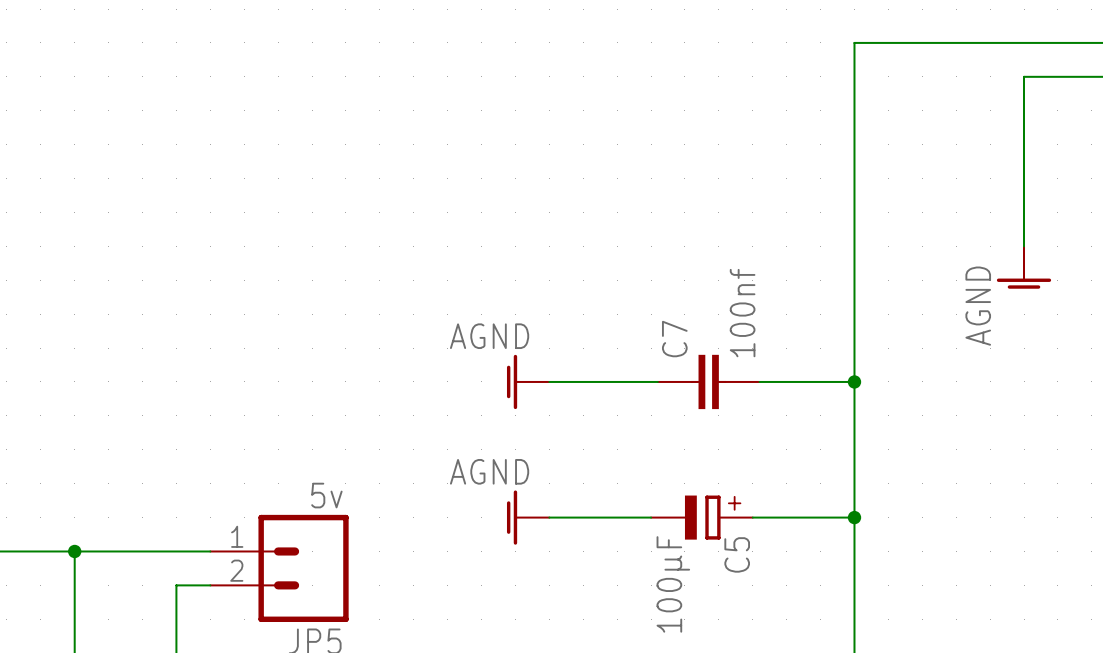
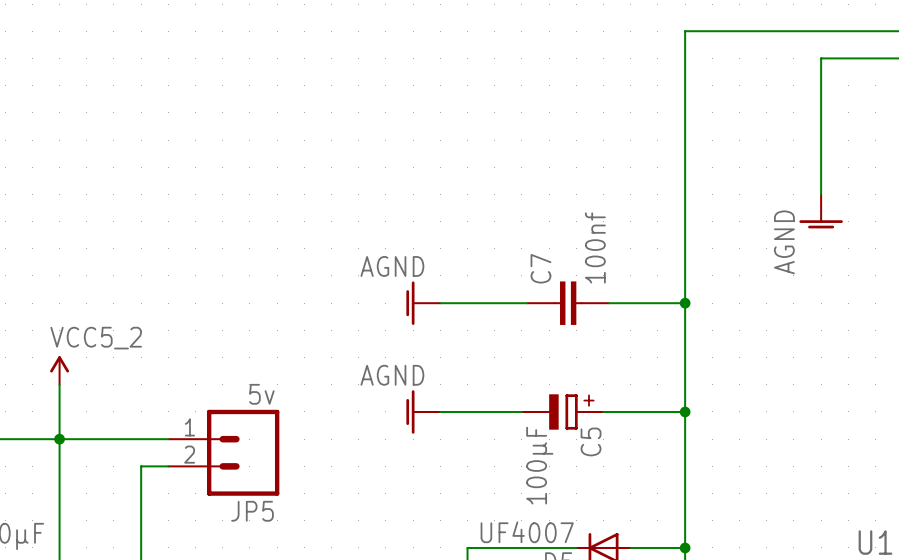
power symbol: none -> VCC5_2 (59, 370)
wire: none -> (59, 384) (59, 439)

